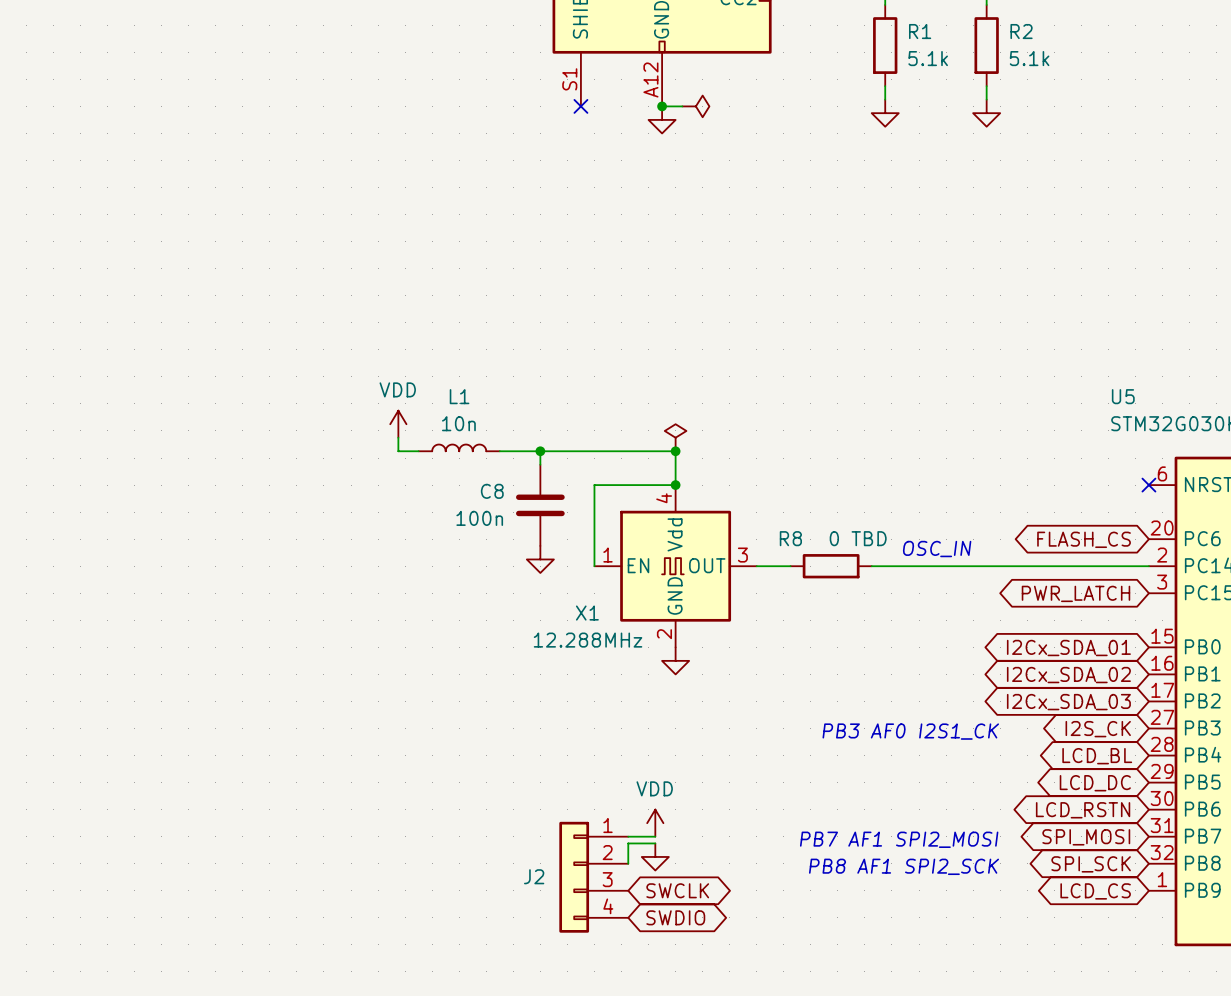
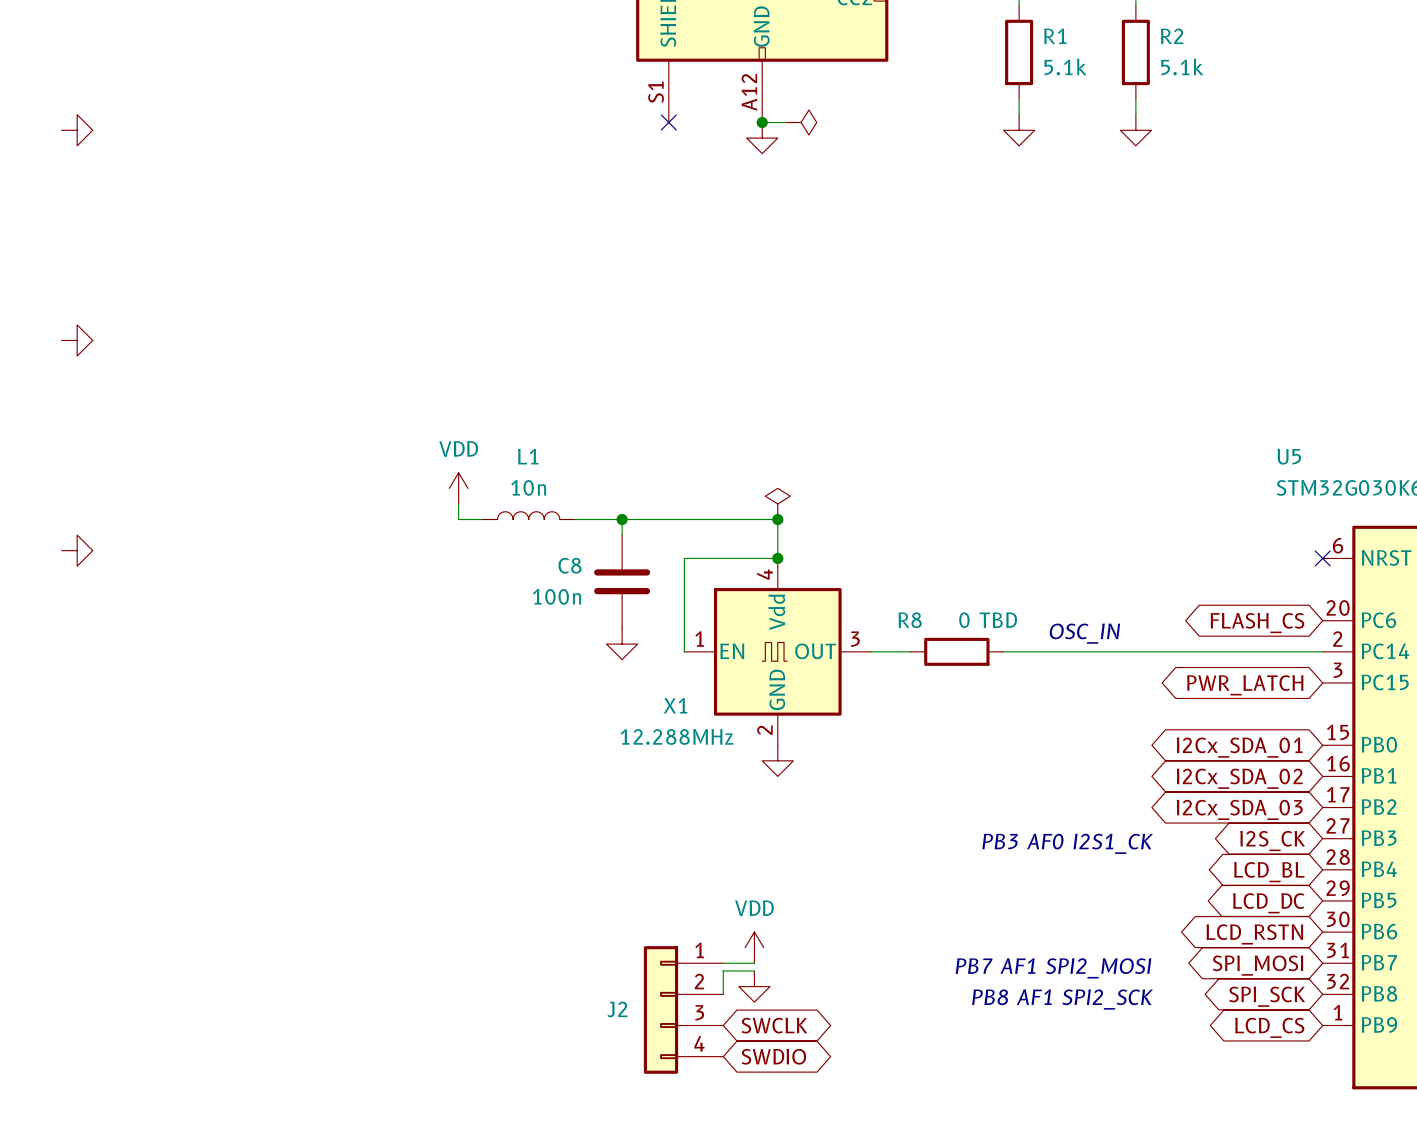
power symbol: none -> (77, 130)
power symbol: none -> (77, 340)
power symbol: none -> (77, 550)

